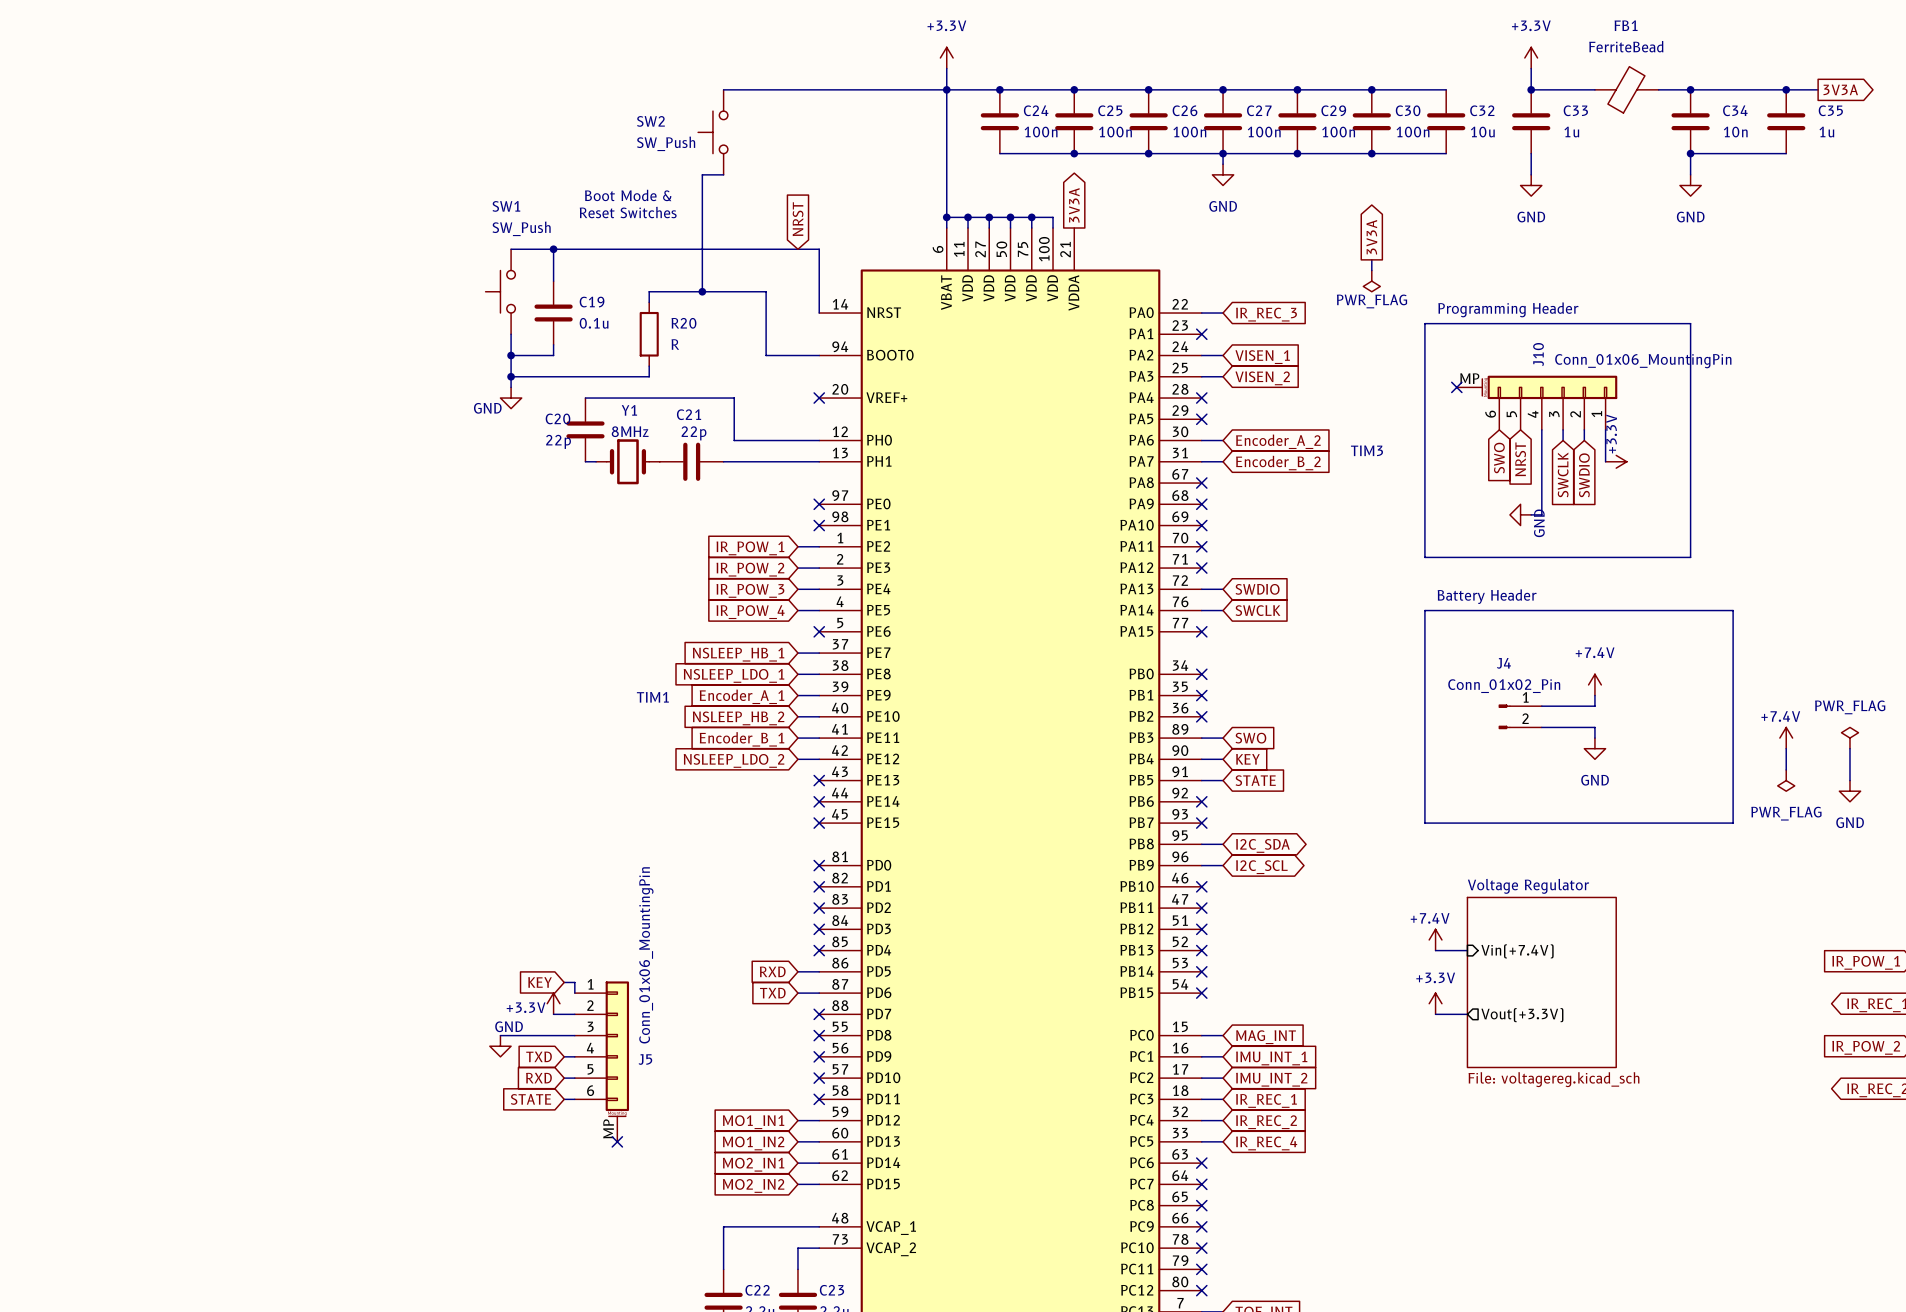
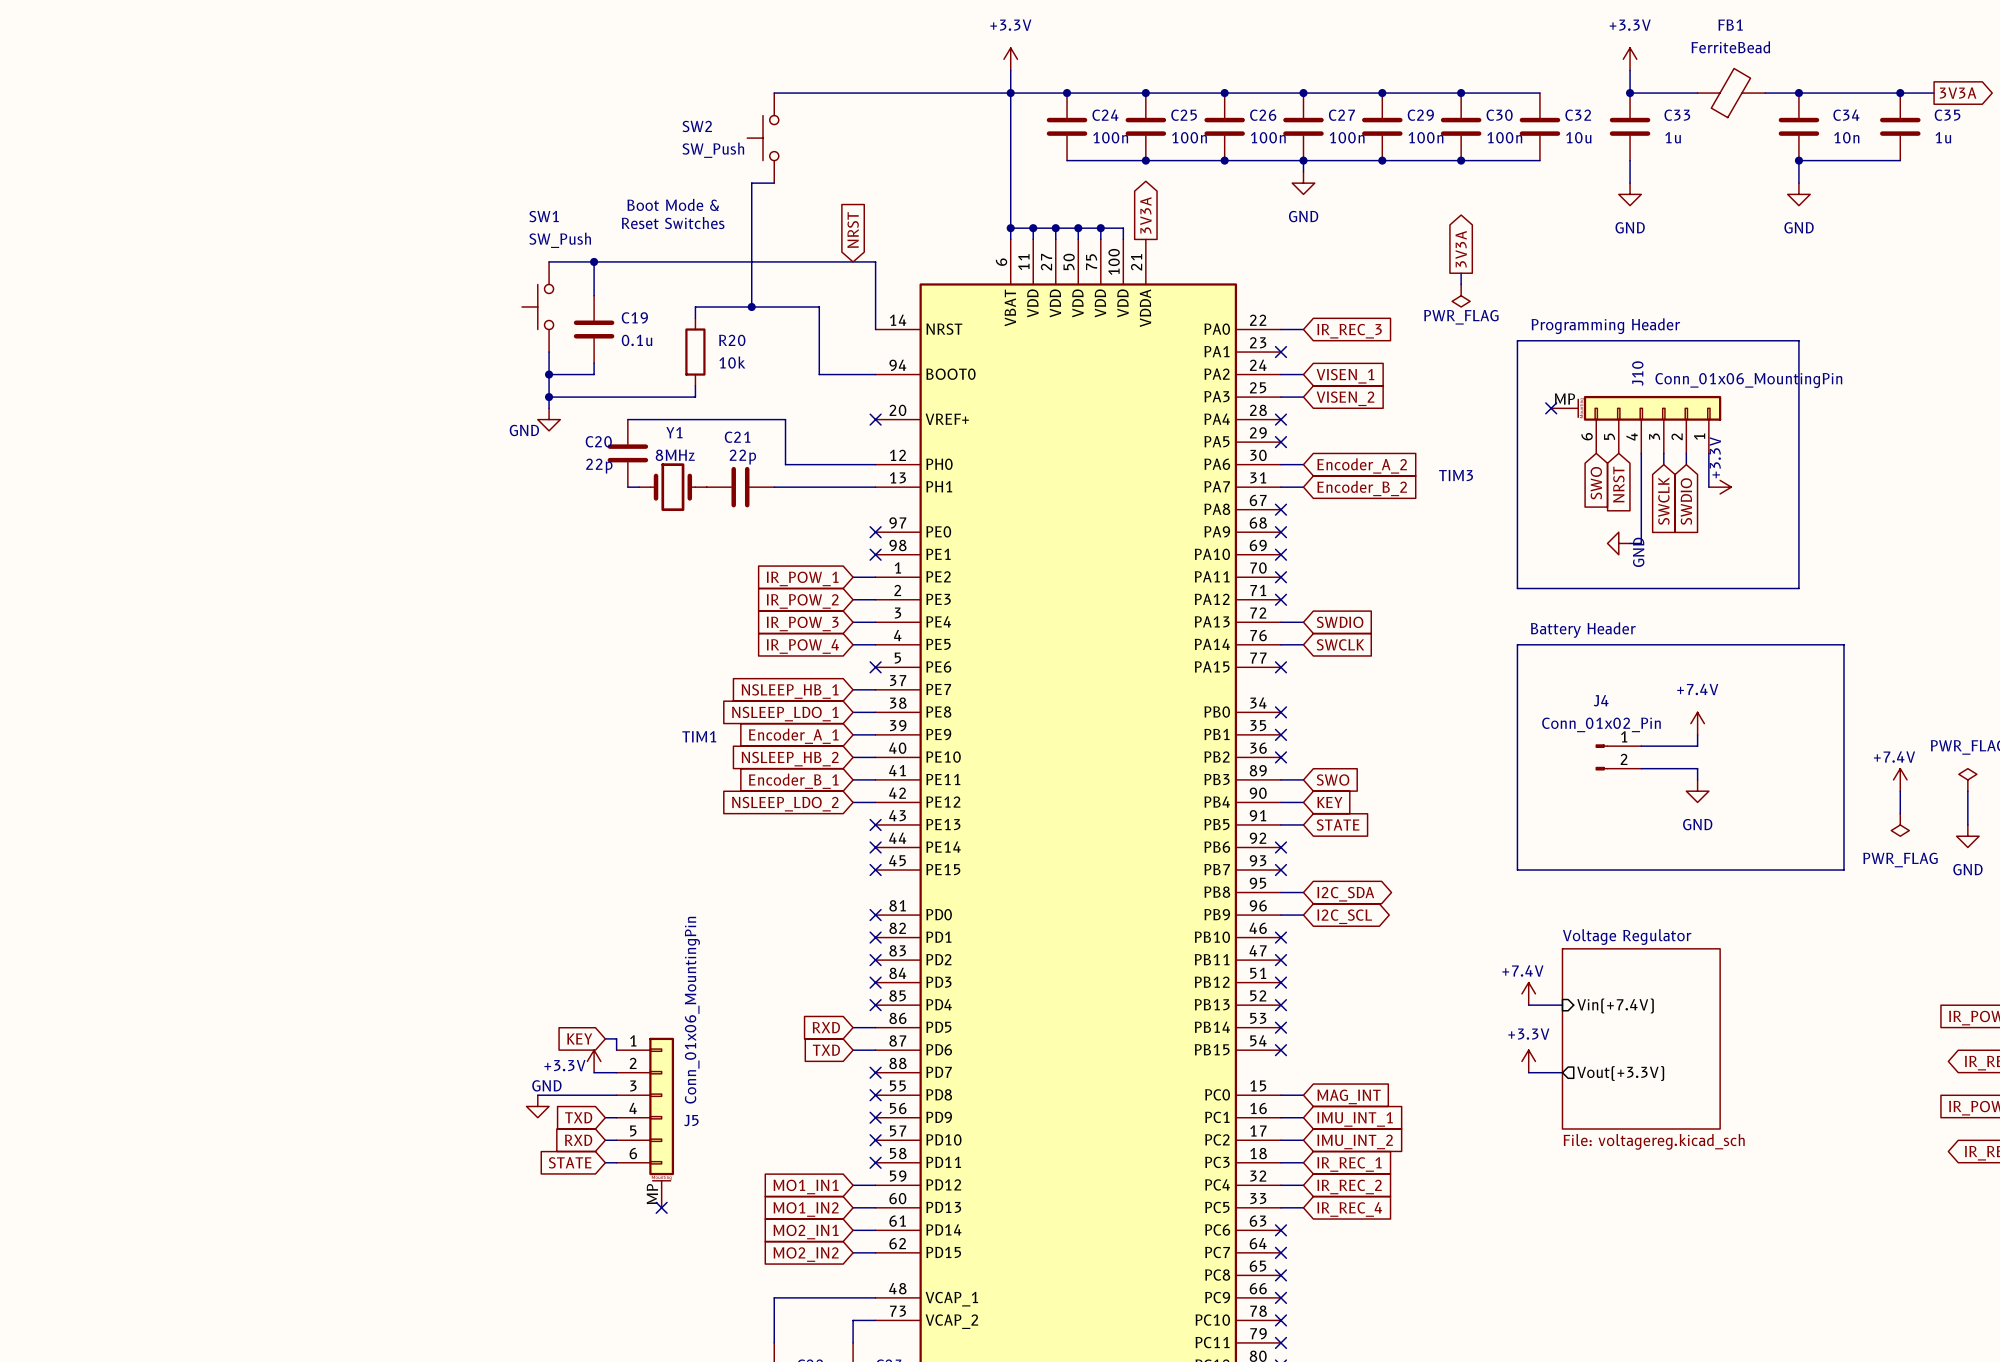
R20 value: R (675, 344) -> 10k (732, 362)

